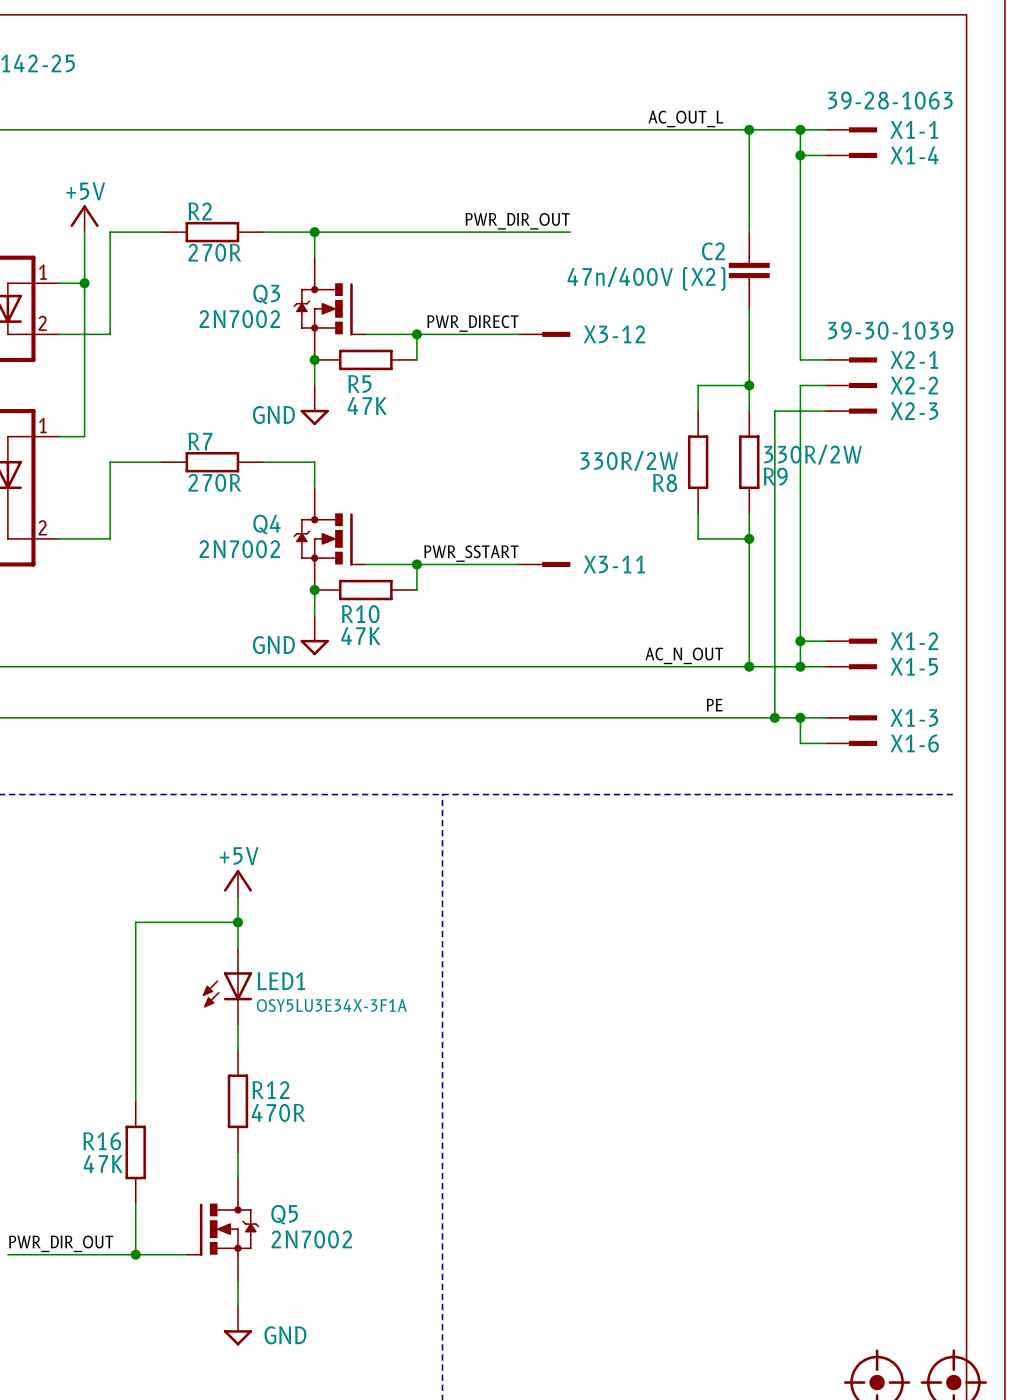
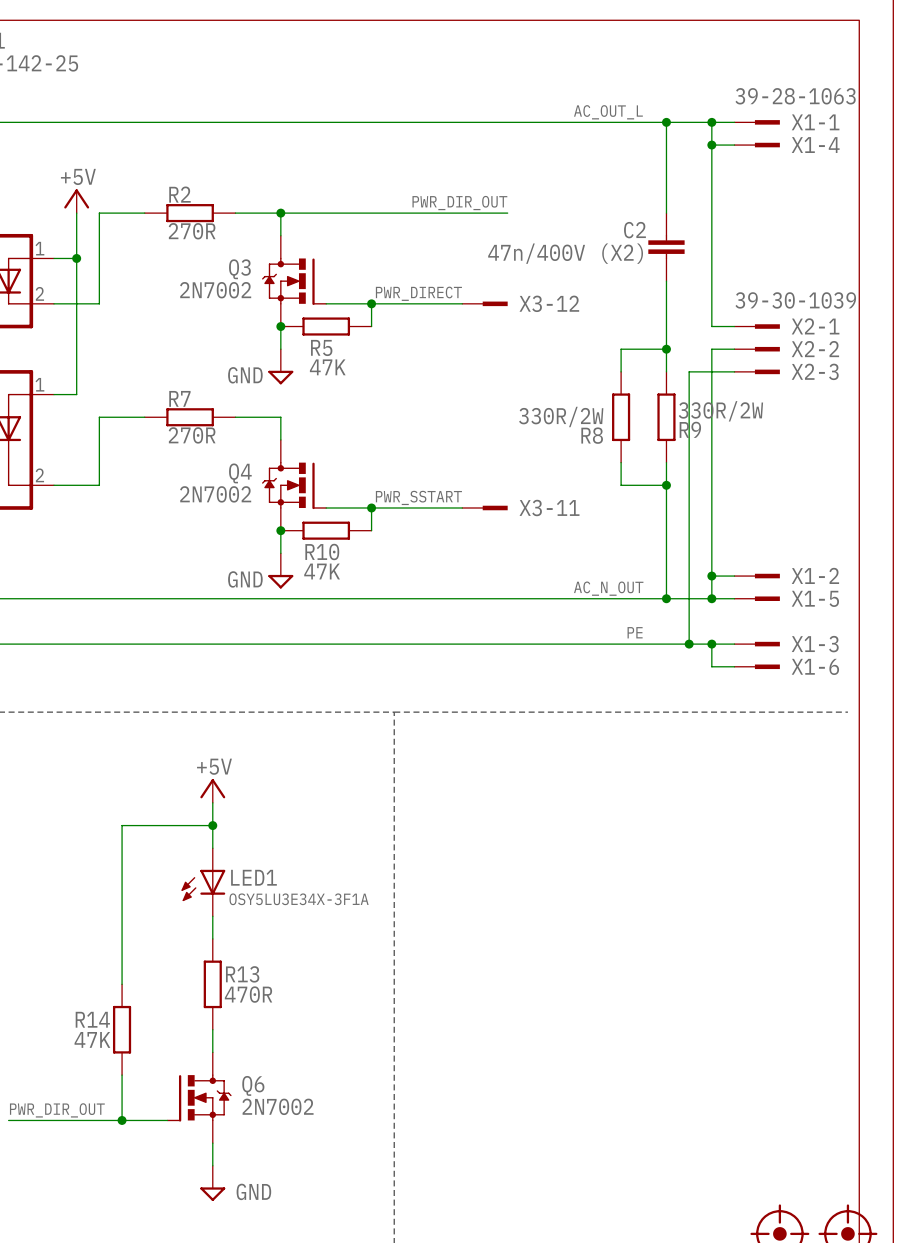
R12 name: R12 (270, 1090) -> R13 (242, 974)
R16 name: R16 (102, 1141) -> R14 (92, 1019)
Q5 name: Q5 (284, 1214) -> Q6 (253, 1085)

